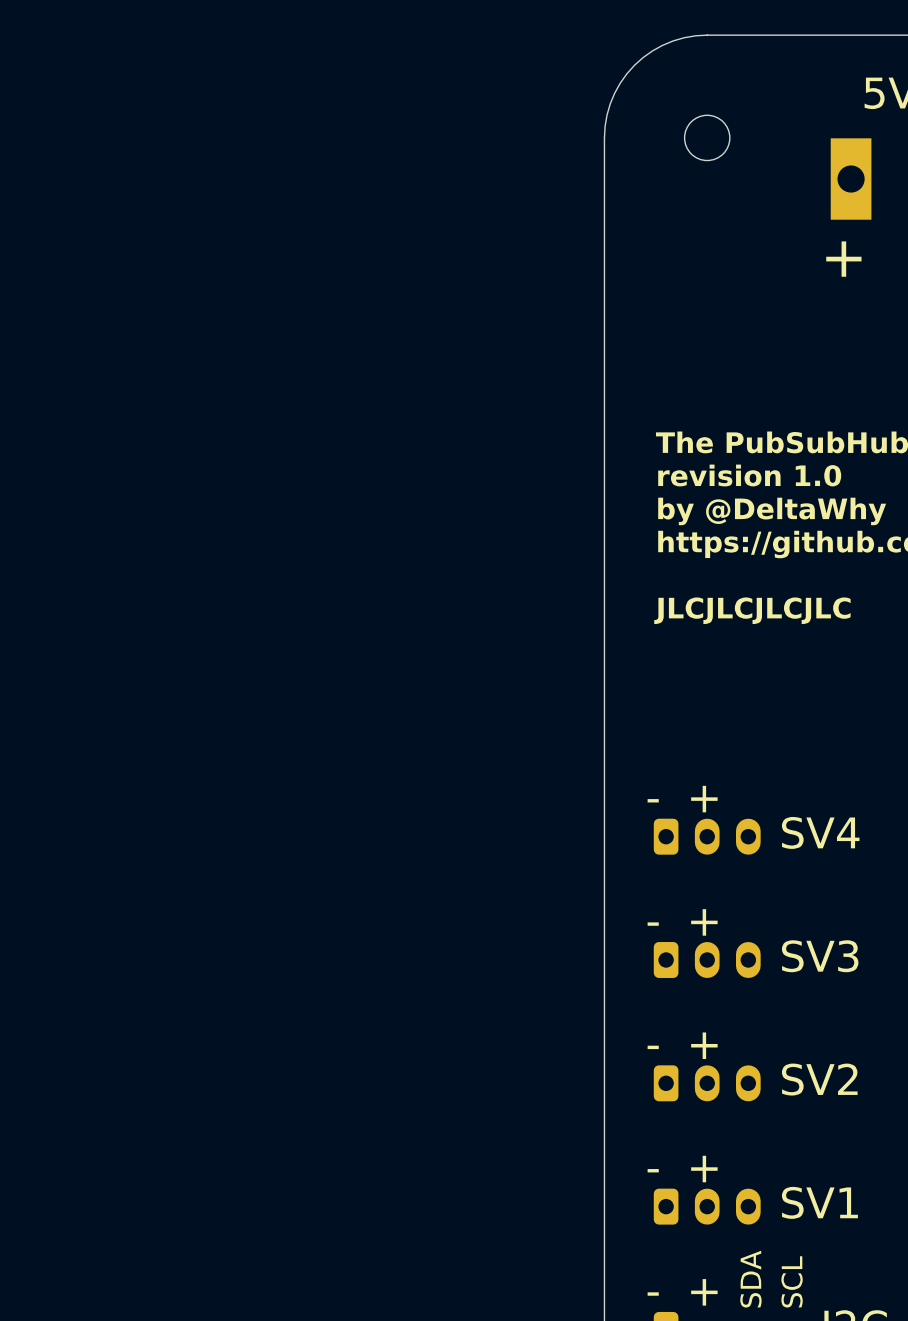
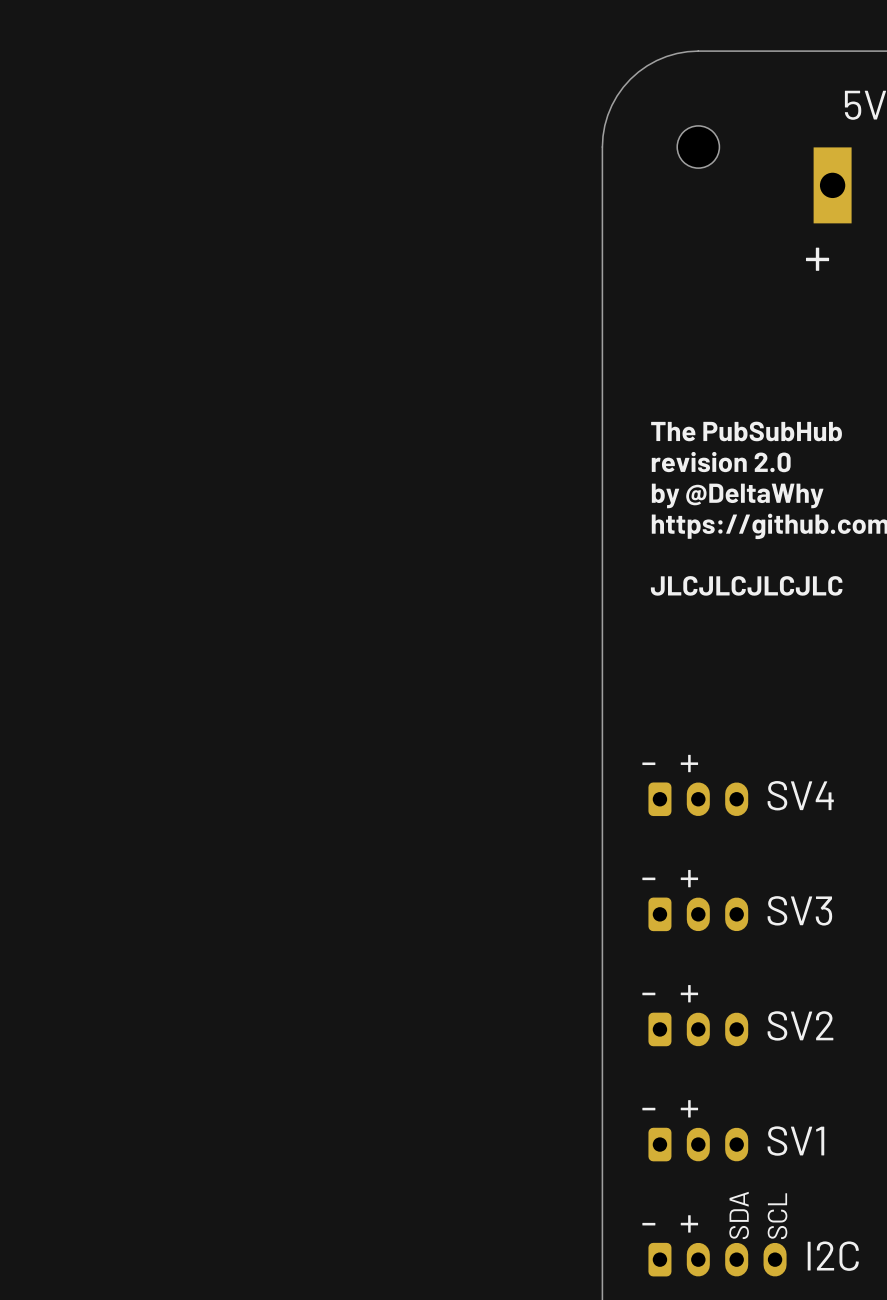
text: revision 1.0 (749, 475) -> revision 2.0 (721, 462)

